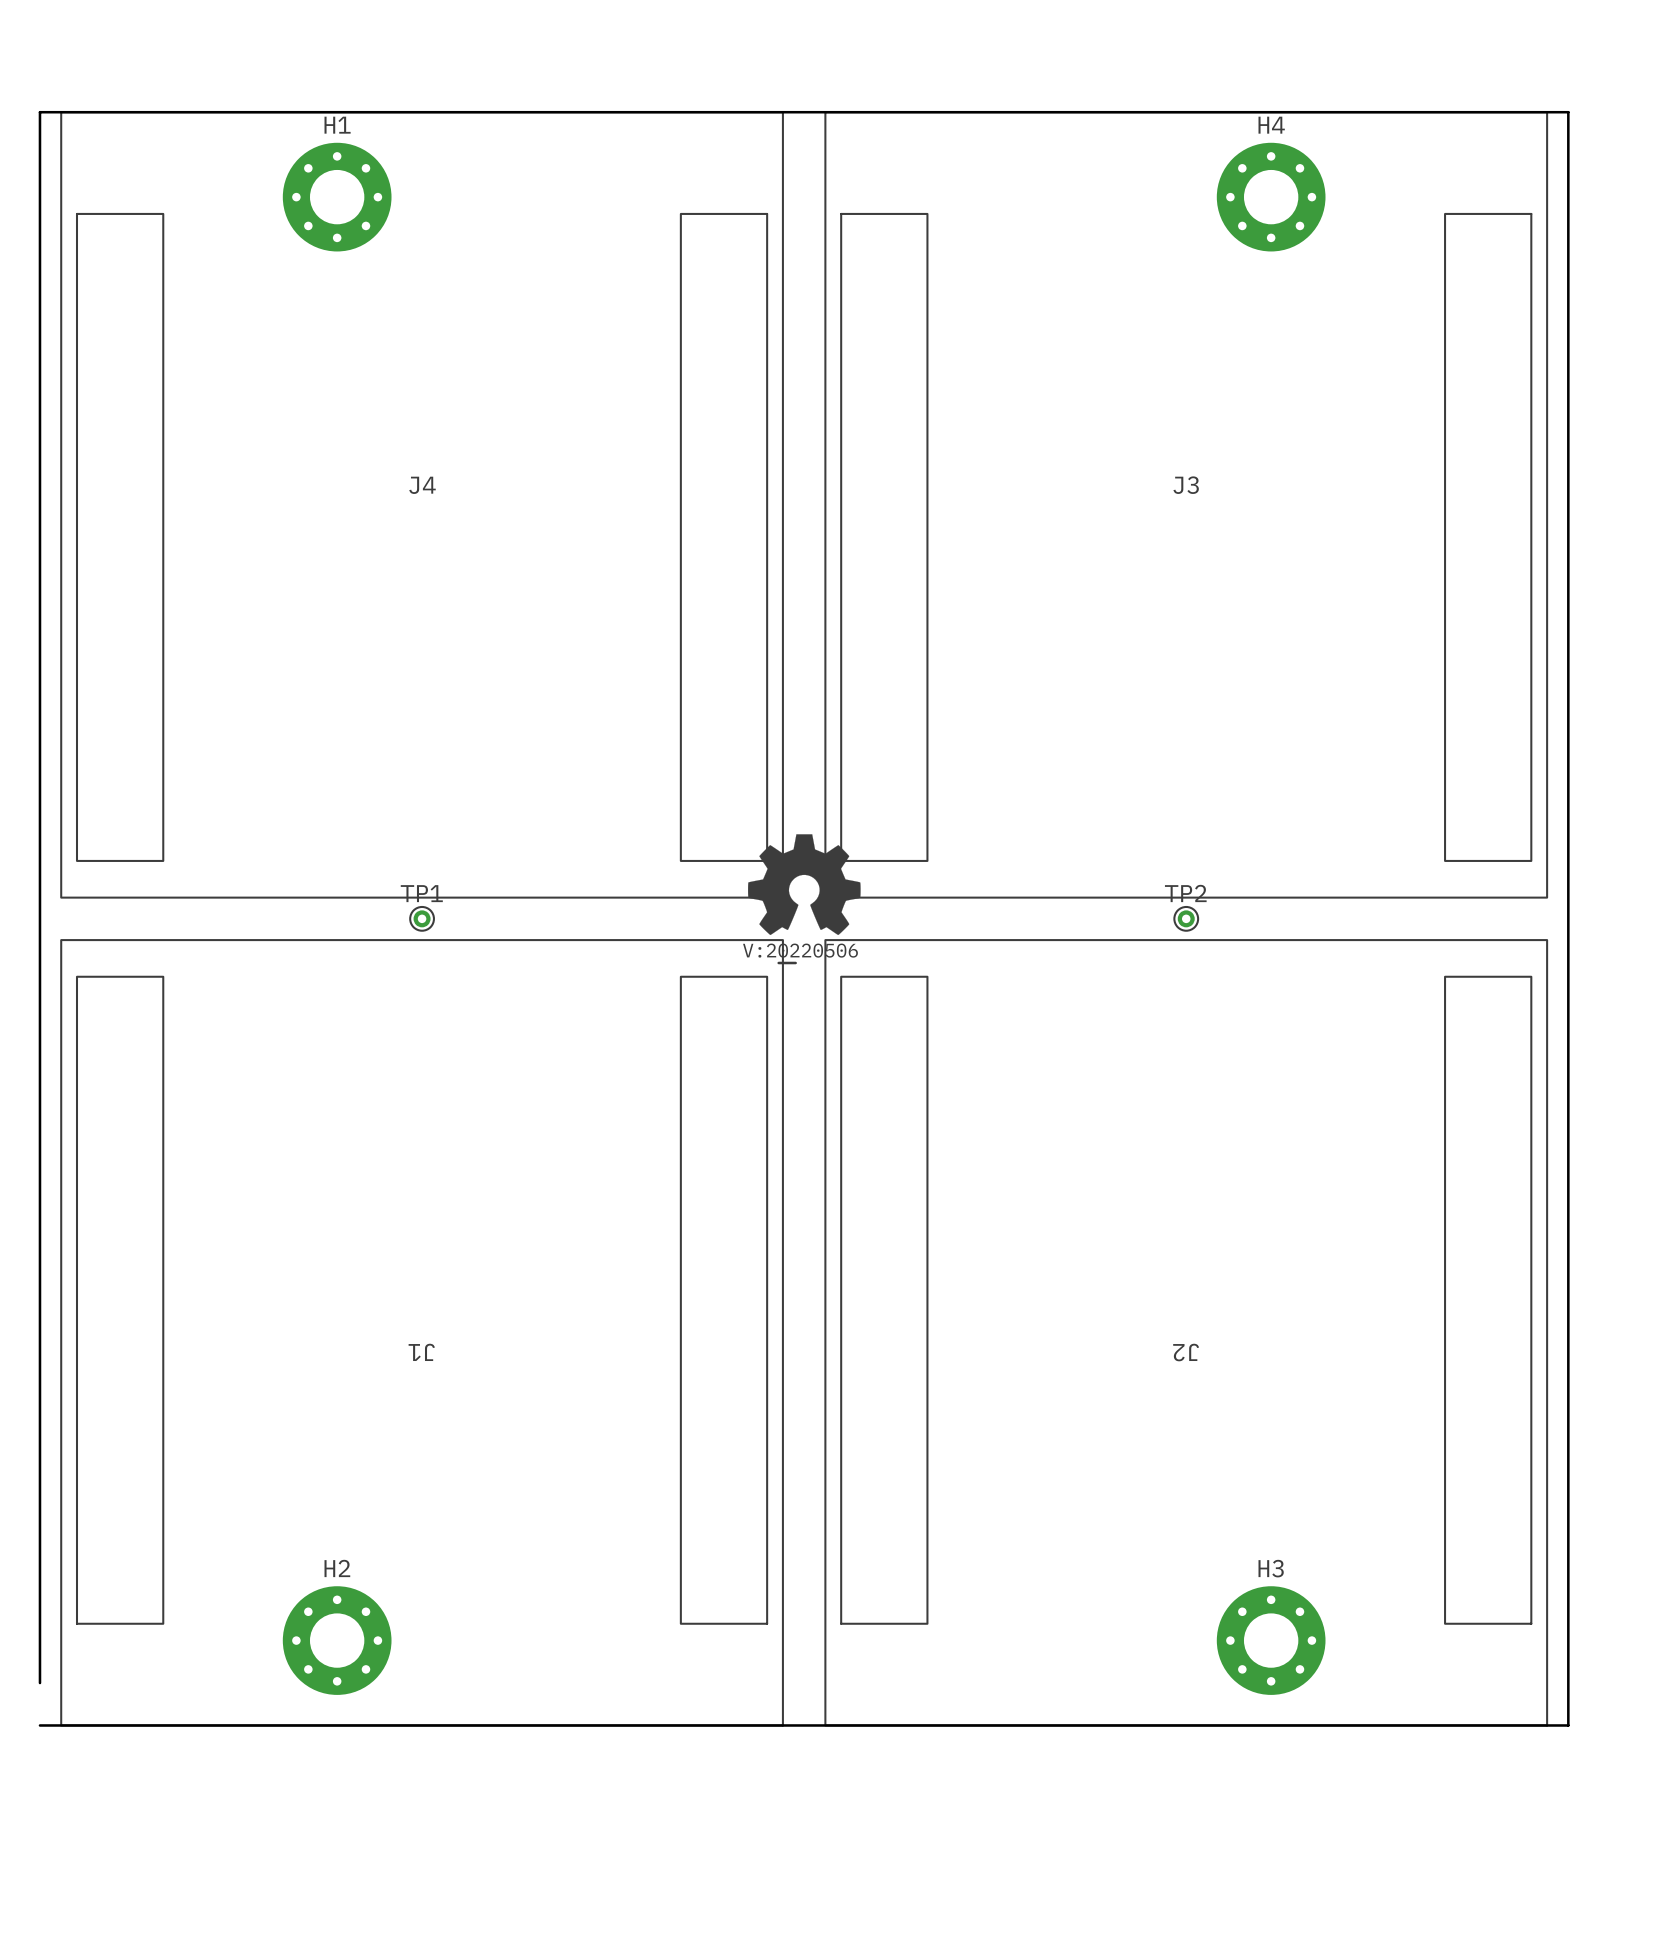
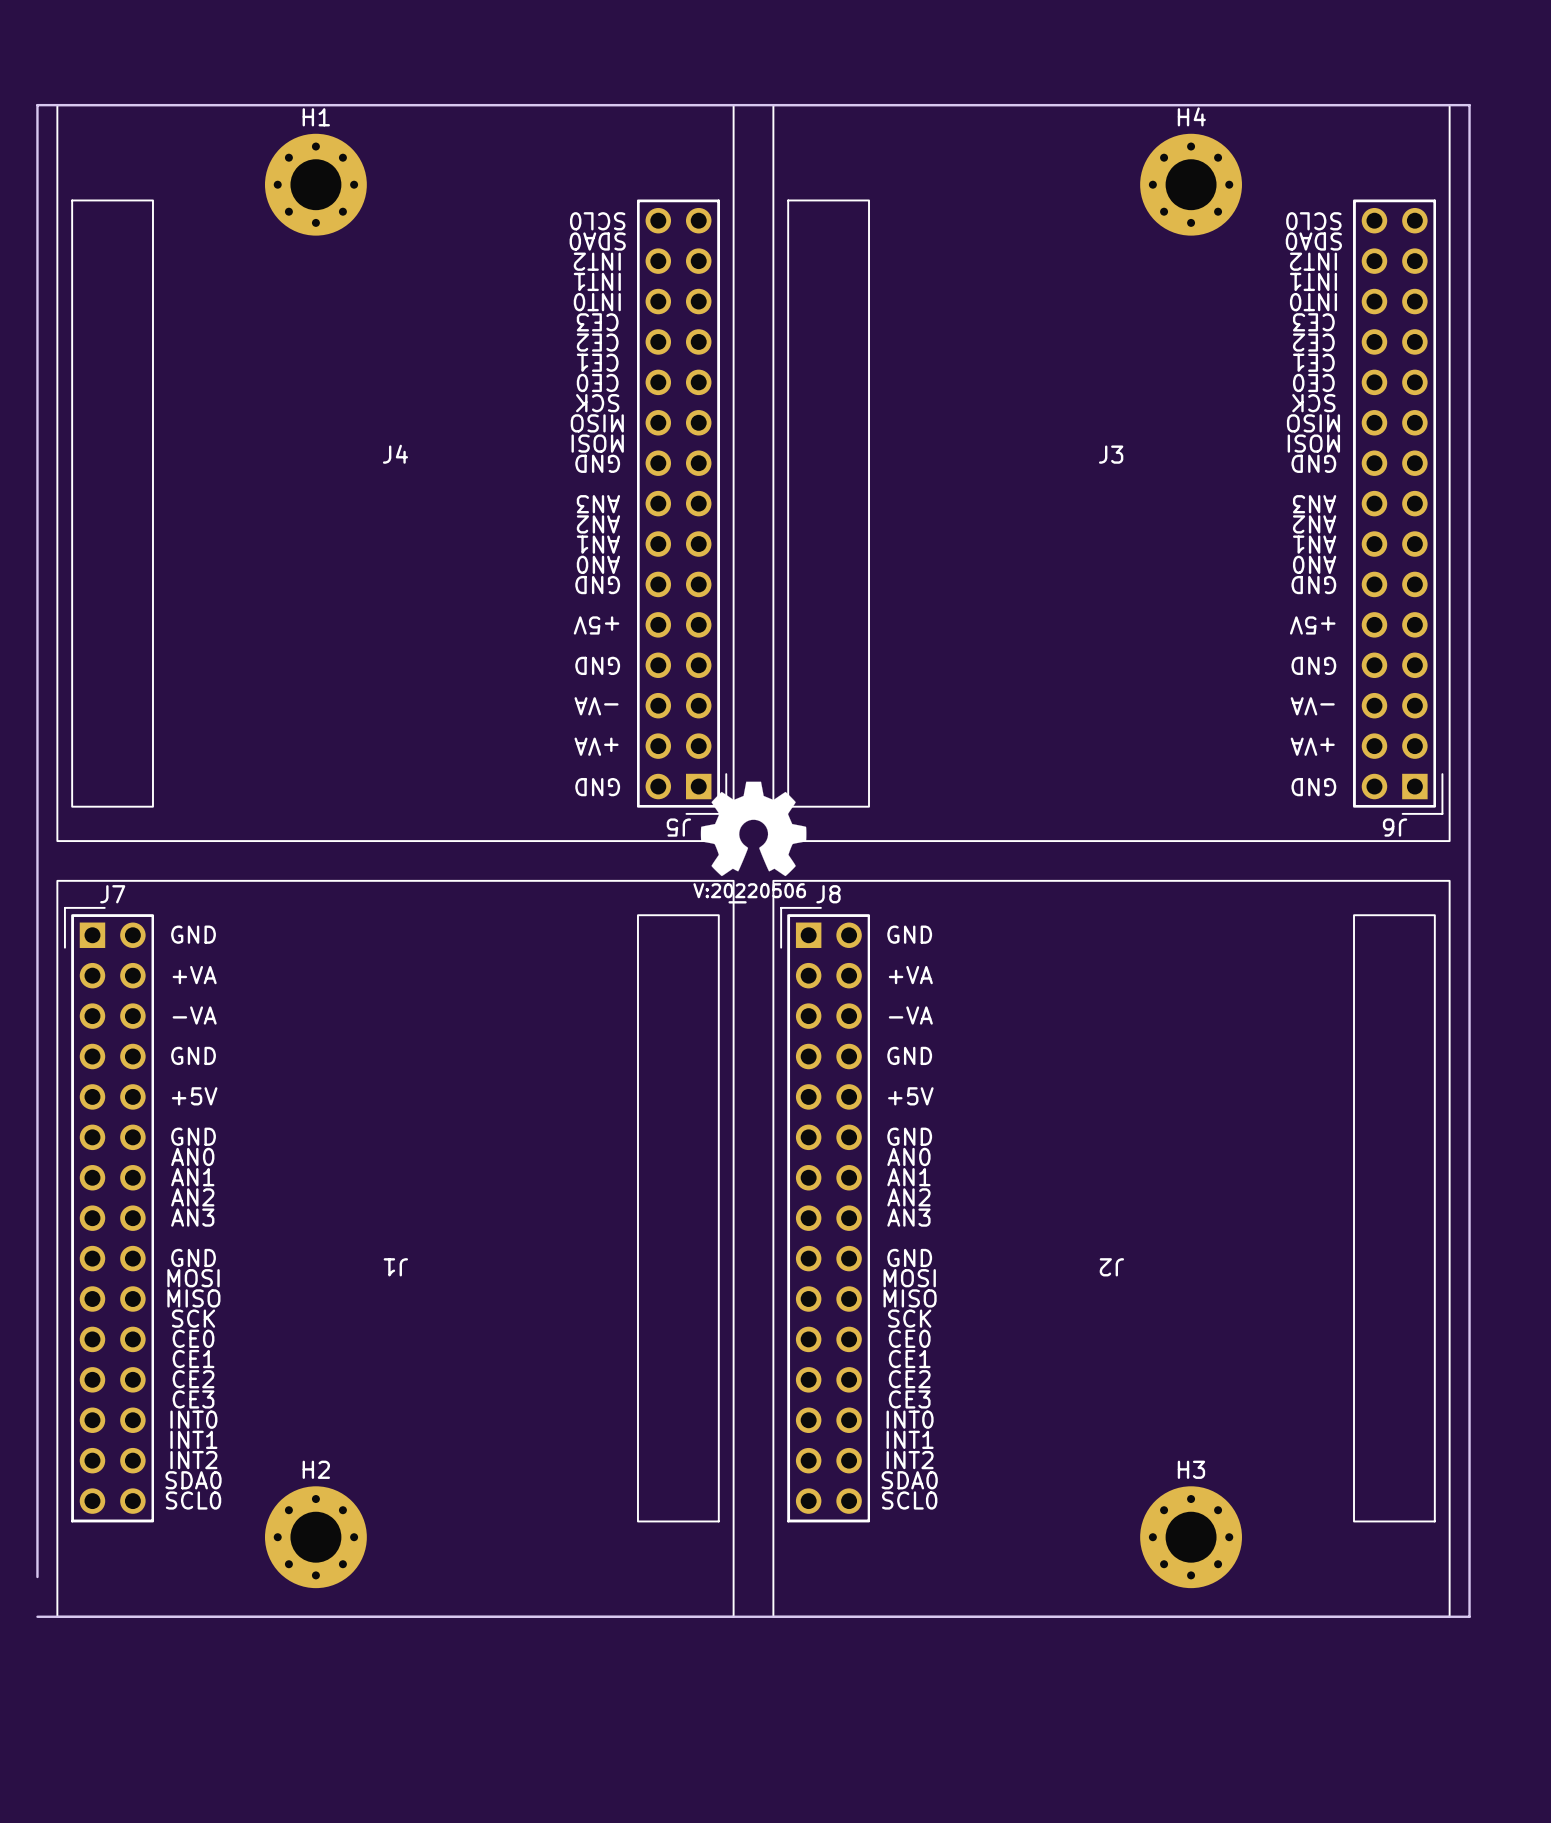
J5: none -> (682, 507)
J6: none -> (1398, 507)
TP1: (422, 918) -> none
TP2: (1186, 918) -> none
J7: none -> (108, 1214)
J8: none -> (824, 1214)

